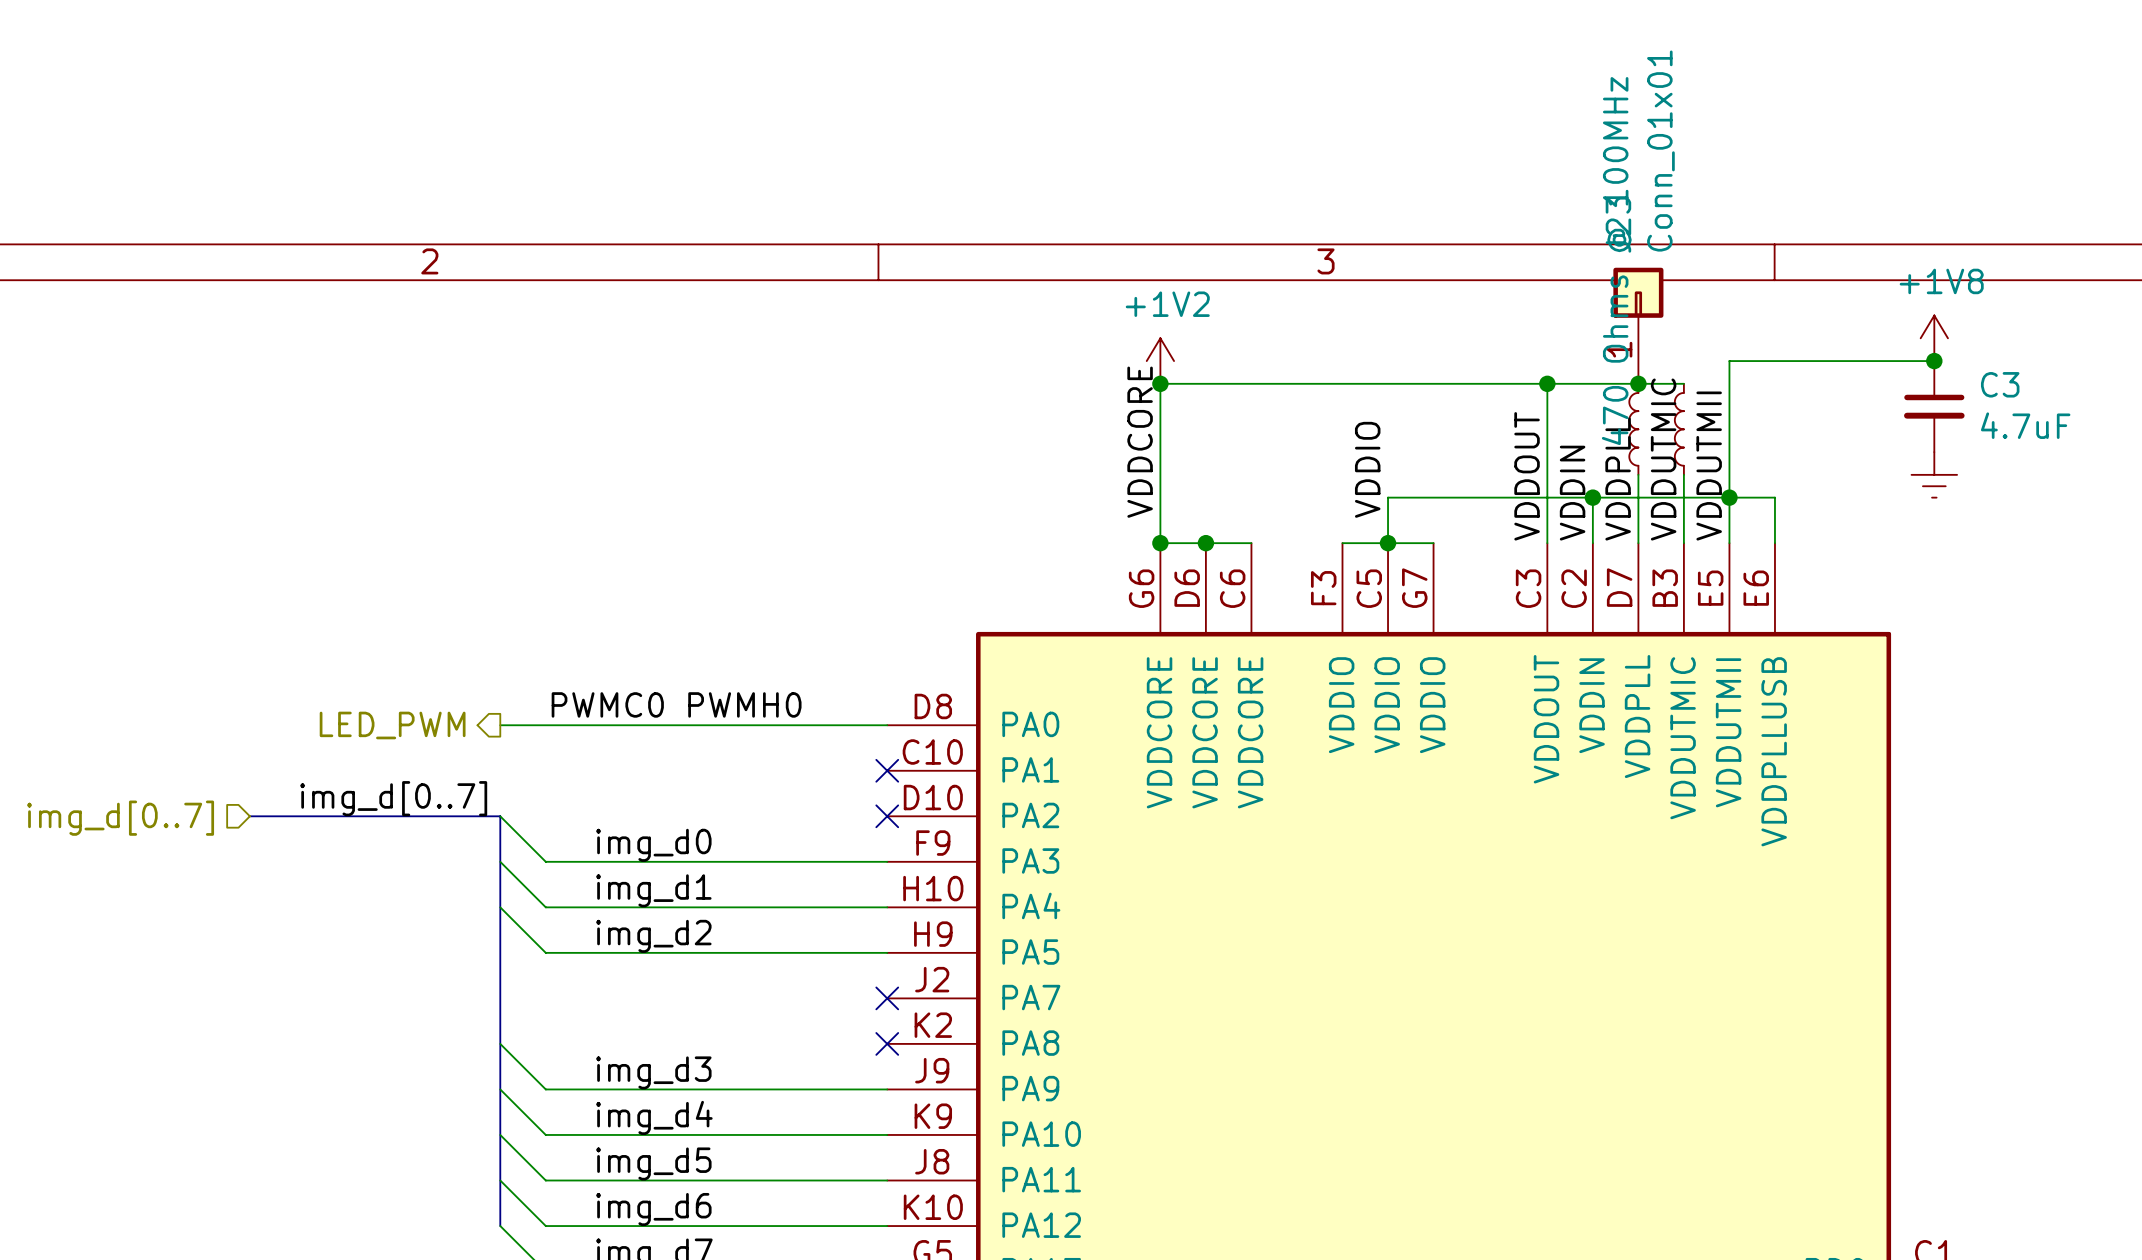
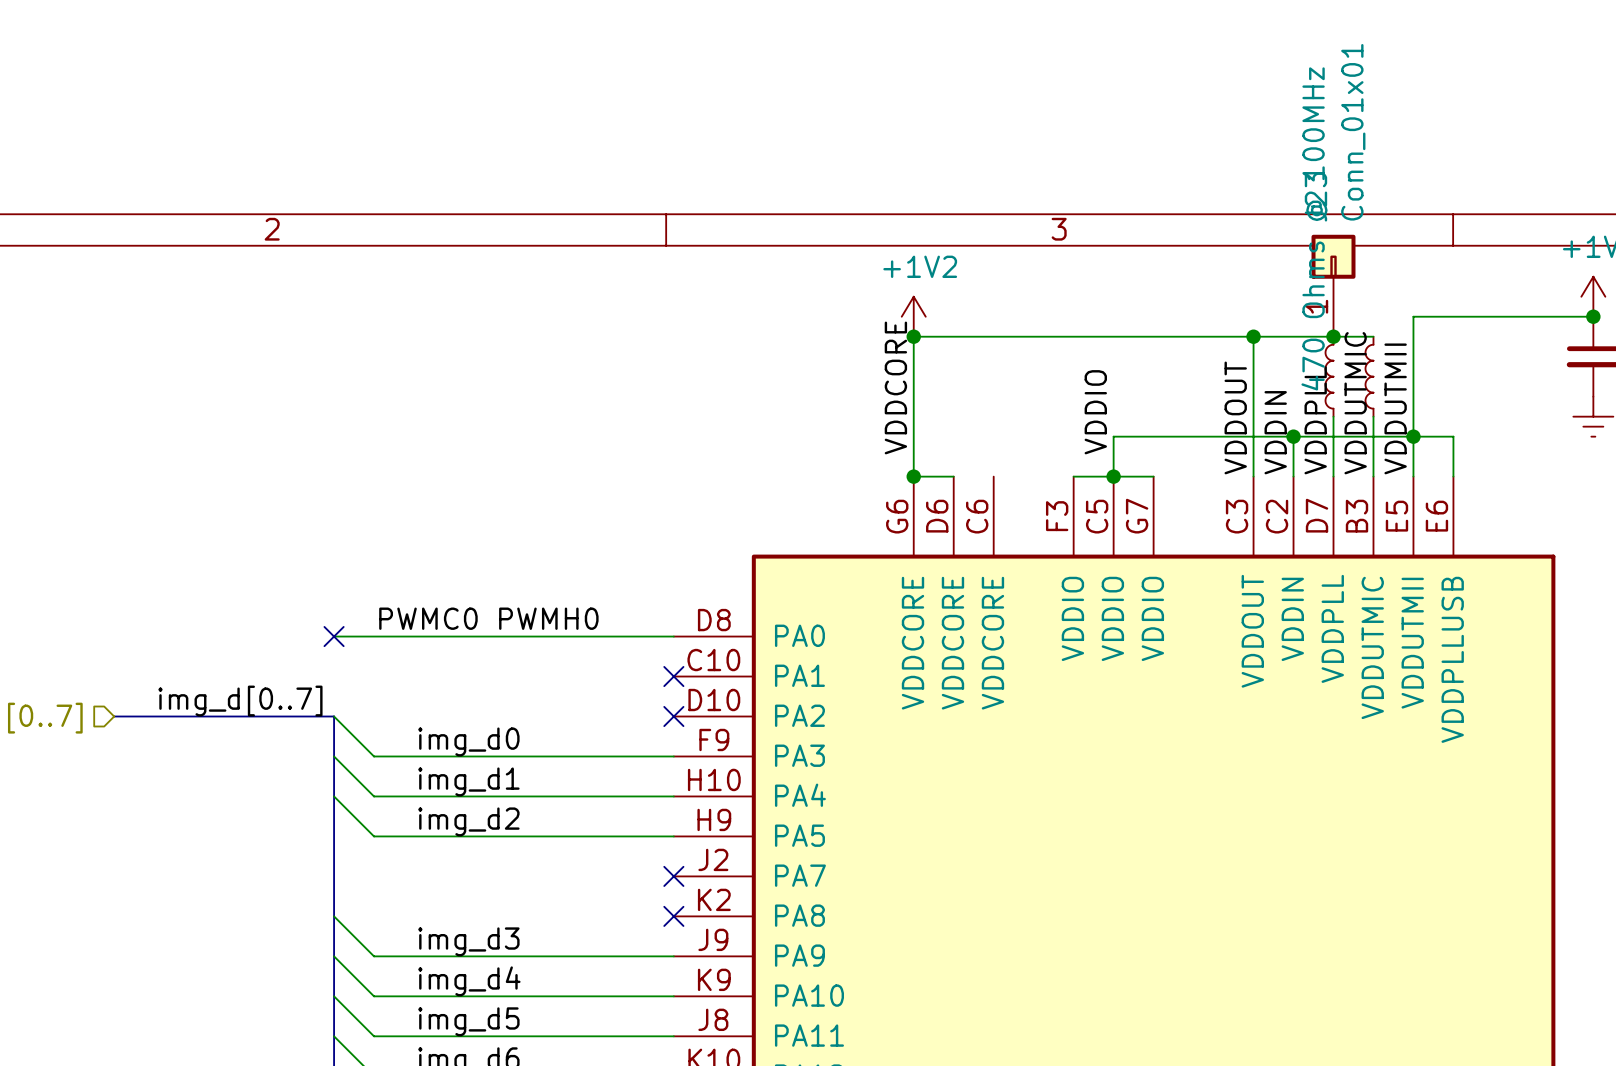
wire: (1205, 543) (1251, 543) -> none
junction: (1205, 543) -> none
hierarchical label: LED_PWM (392, 725) -> none
no-connect mark: none -> (334, 636)

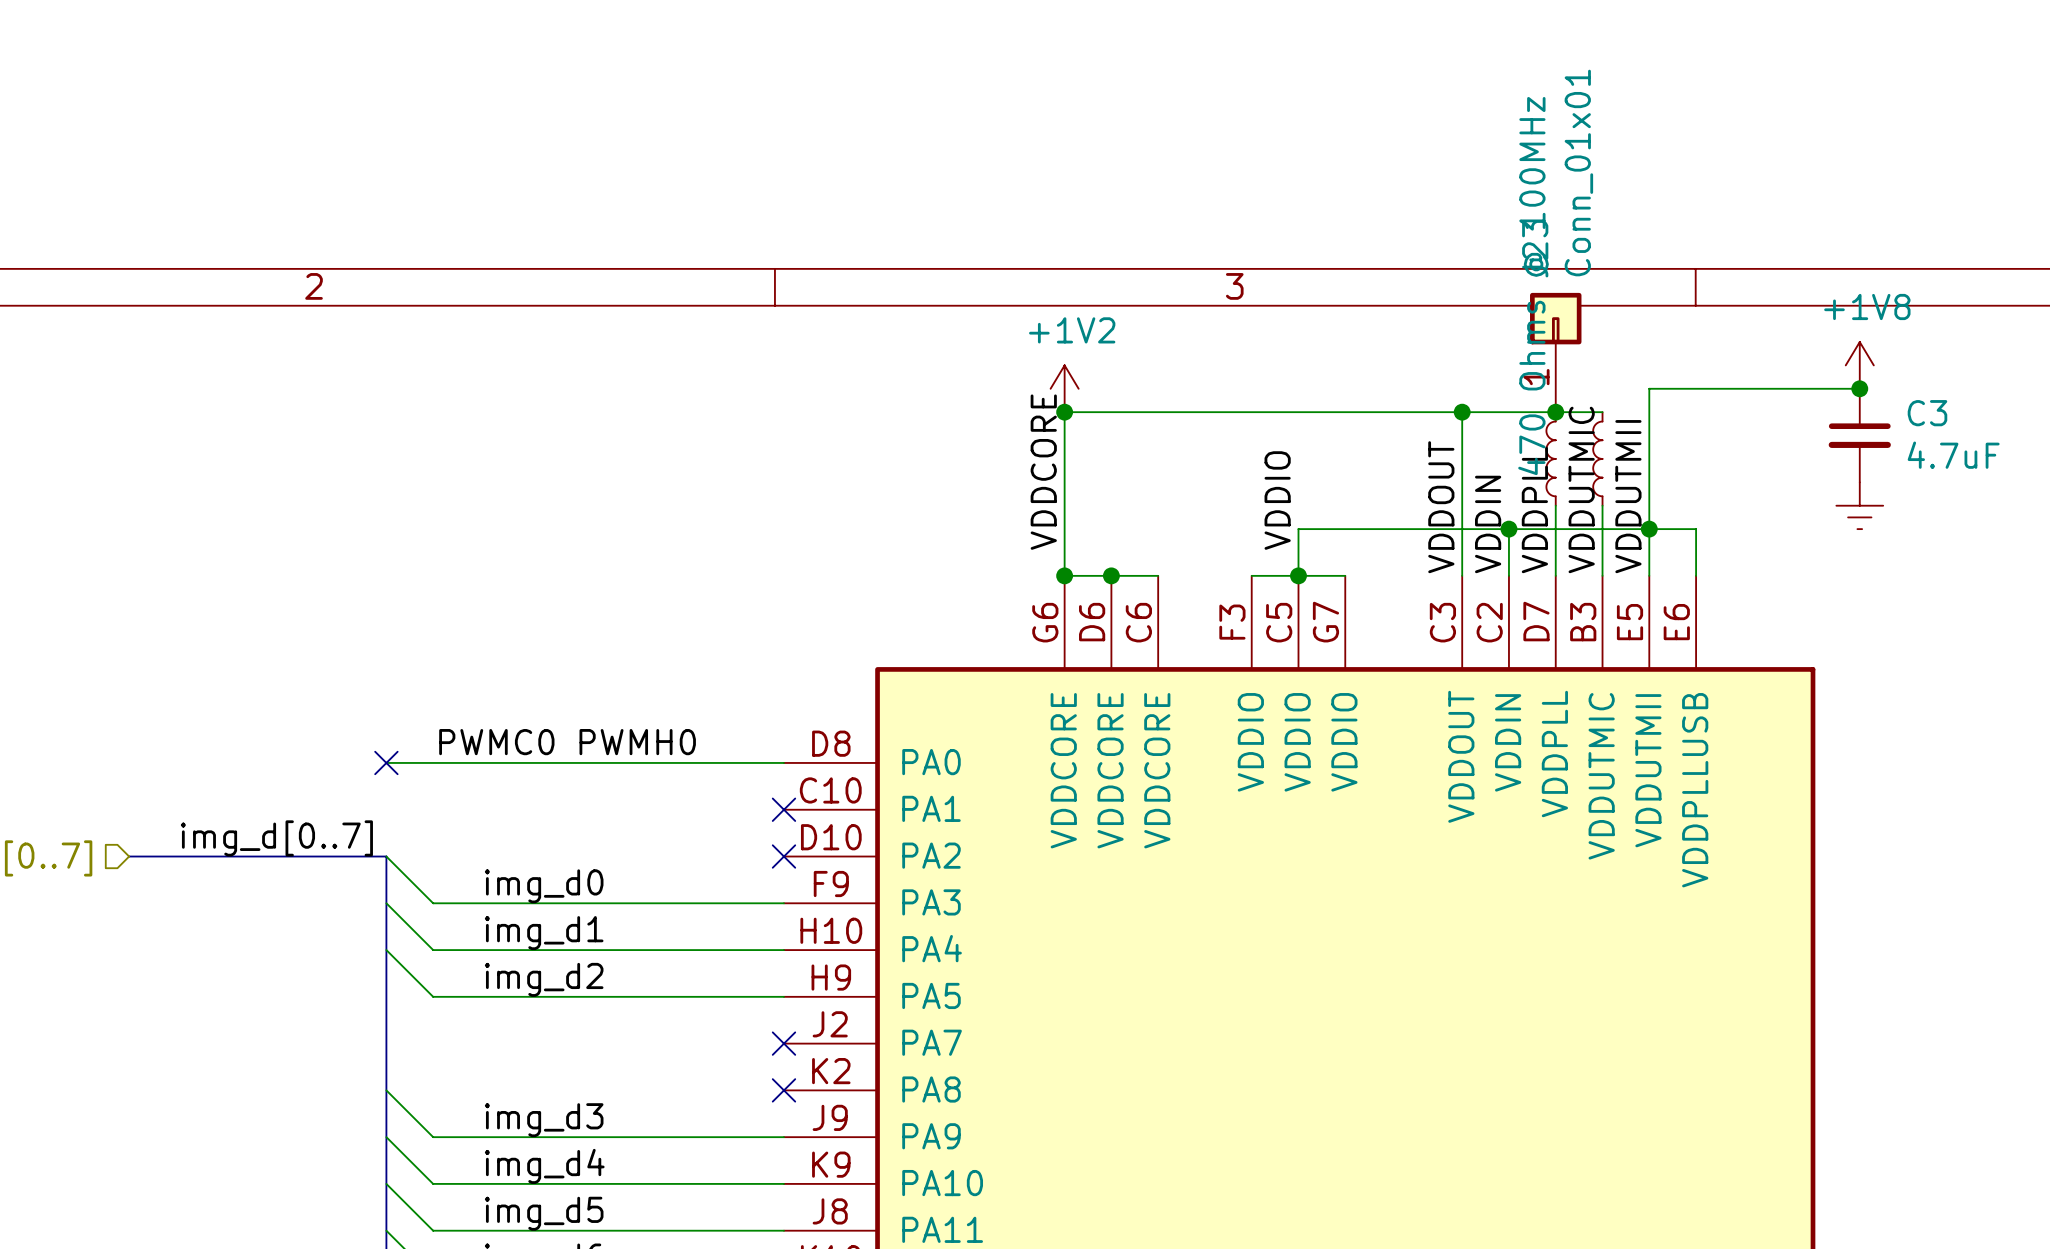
wire: none -> (1111, 575) (1158, 575)
junction: none -> (1111, 575)

